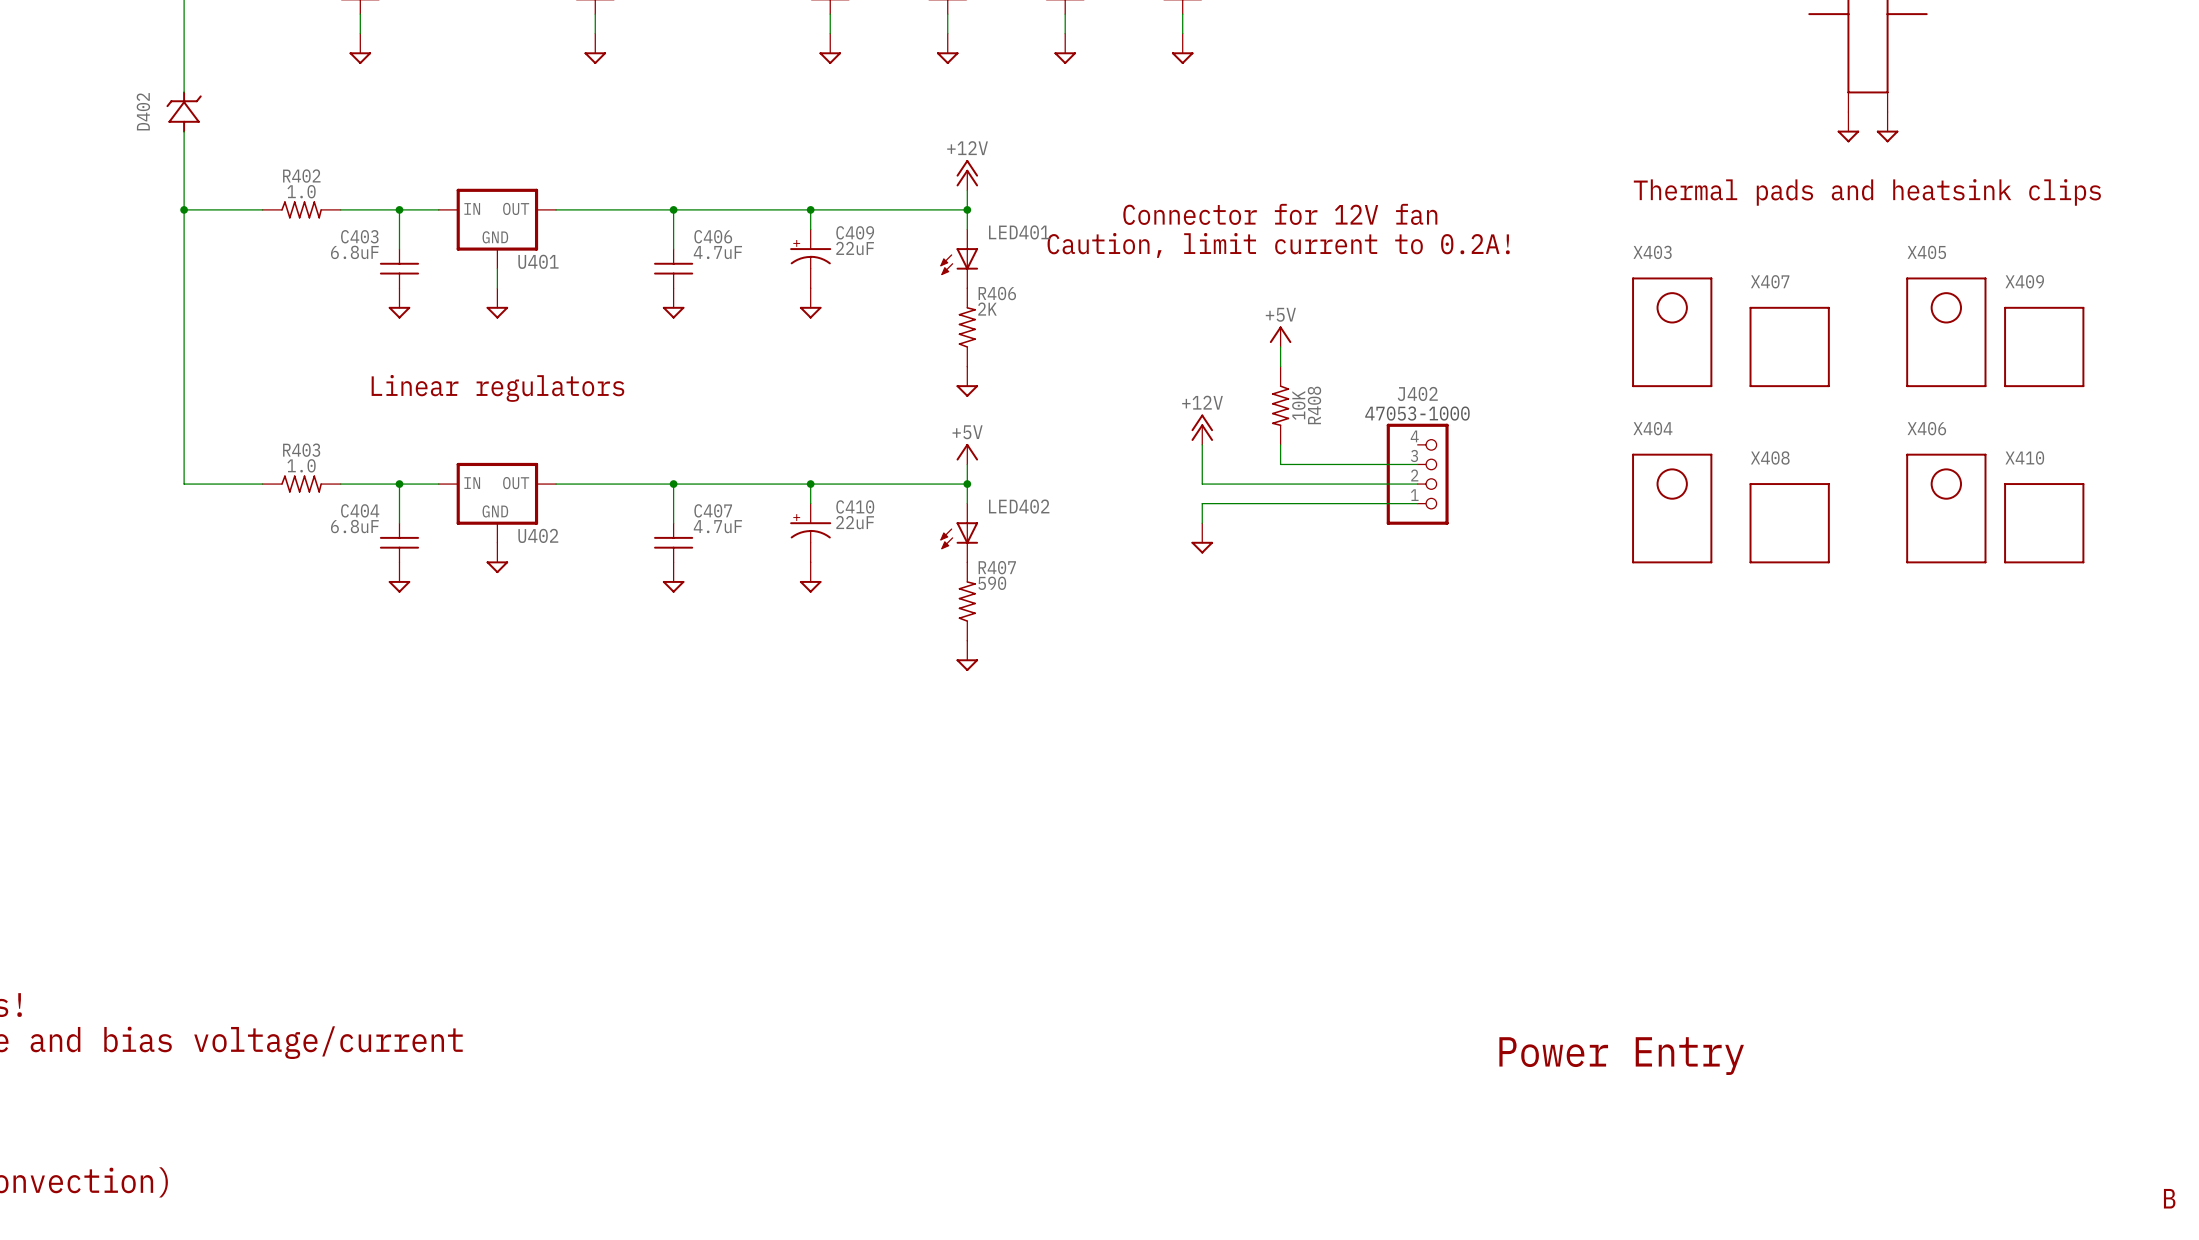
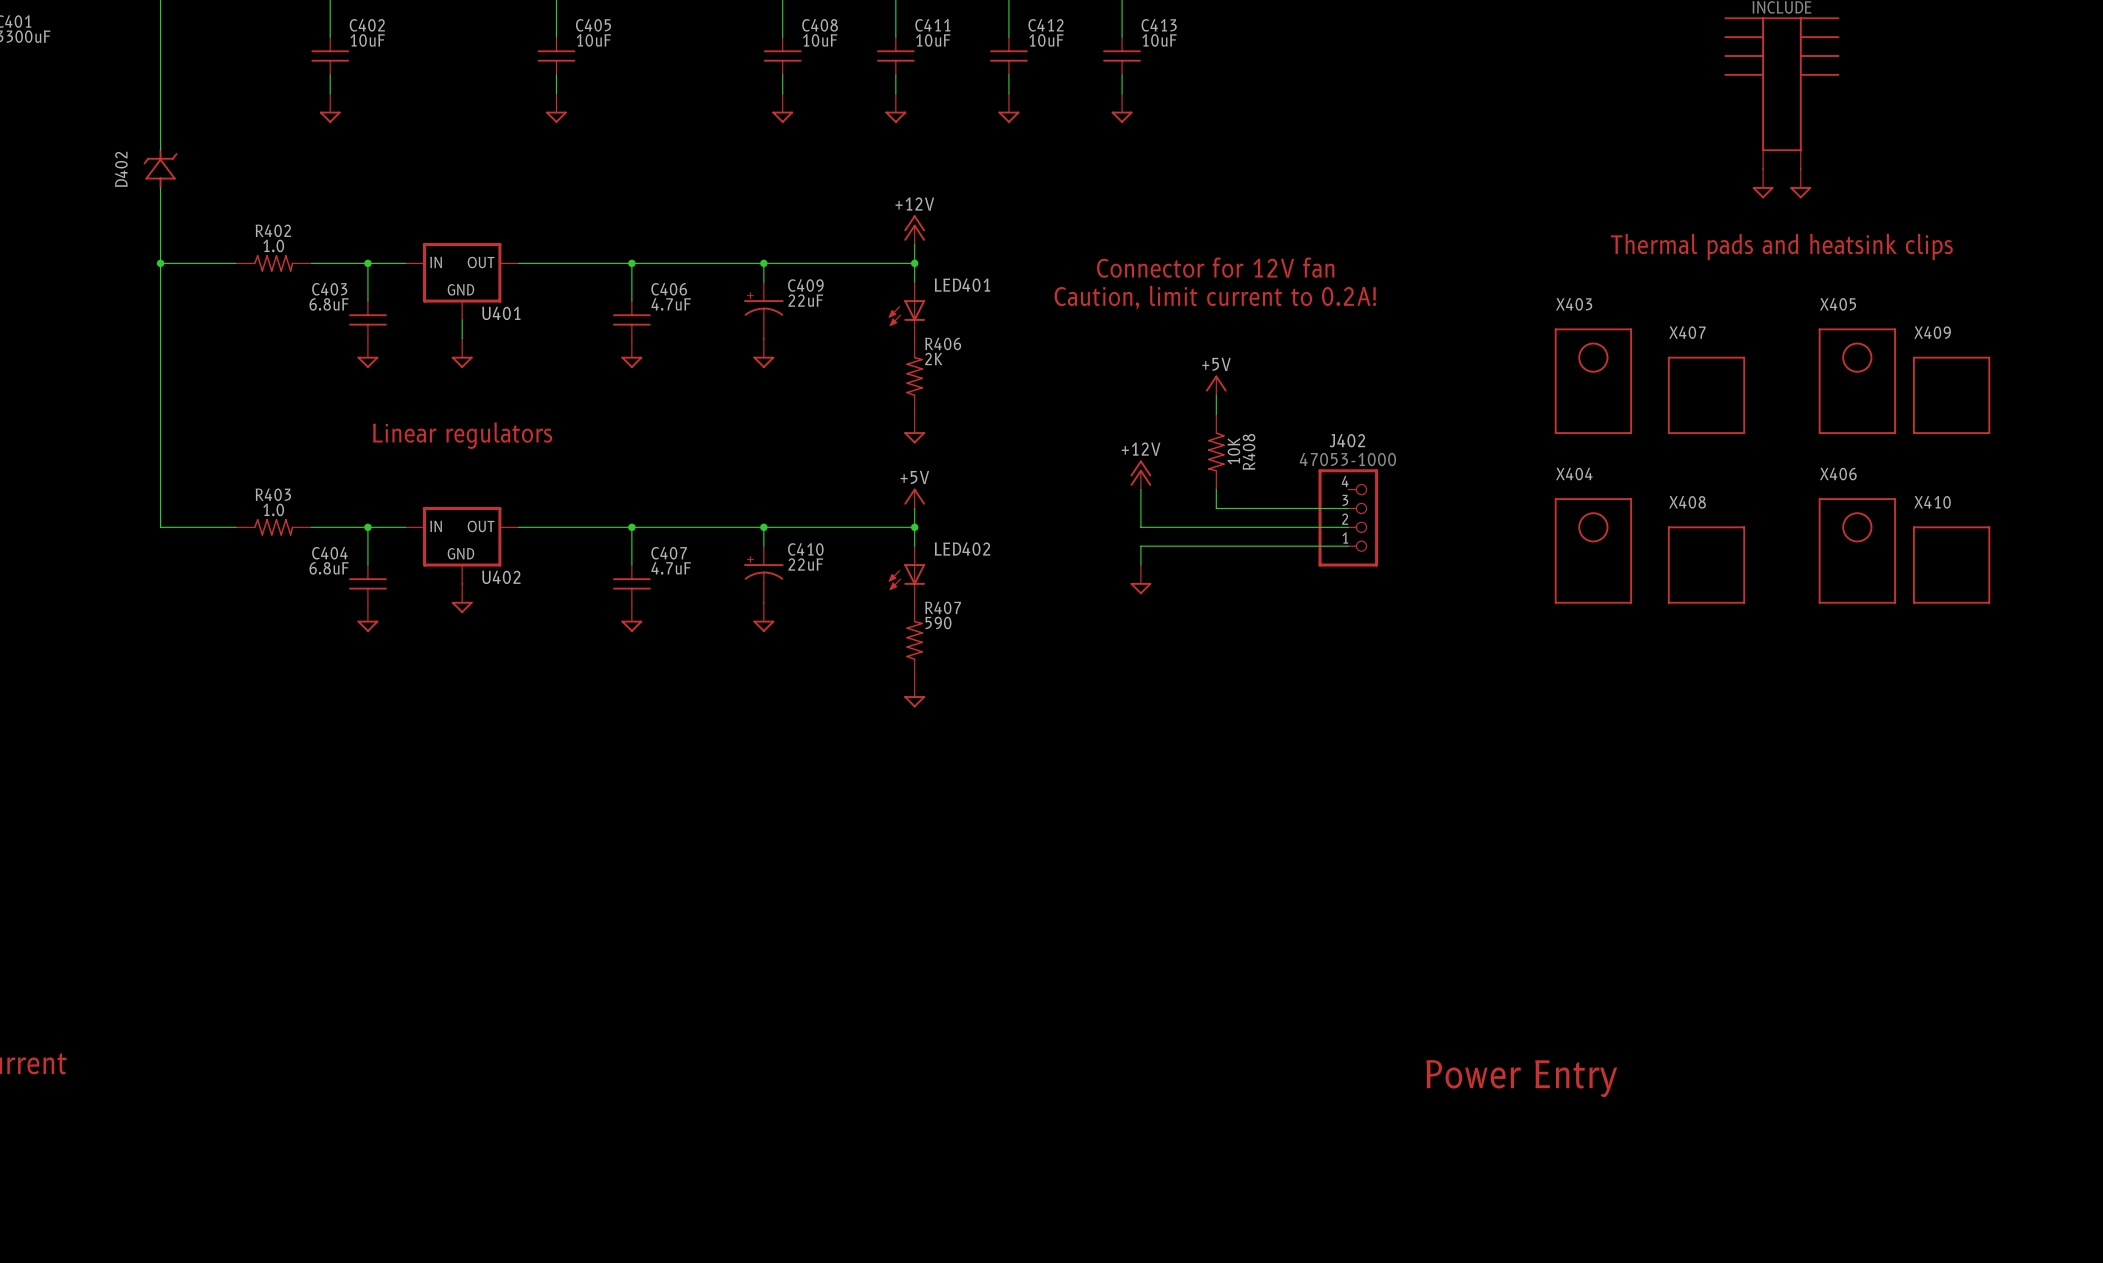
text: B (2169, 1198) -> none

